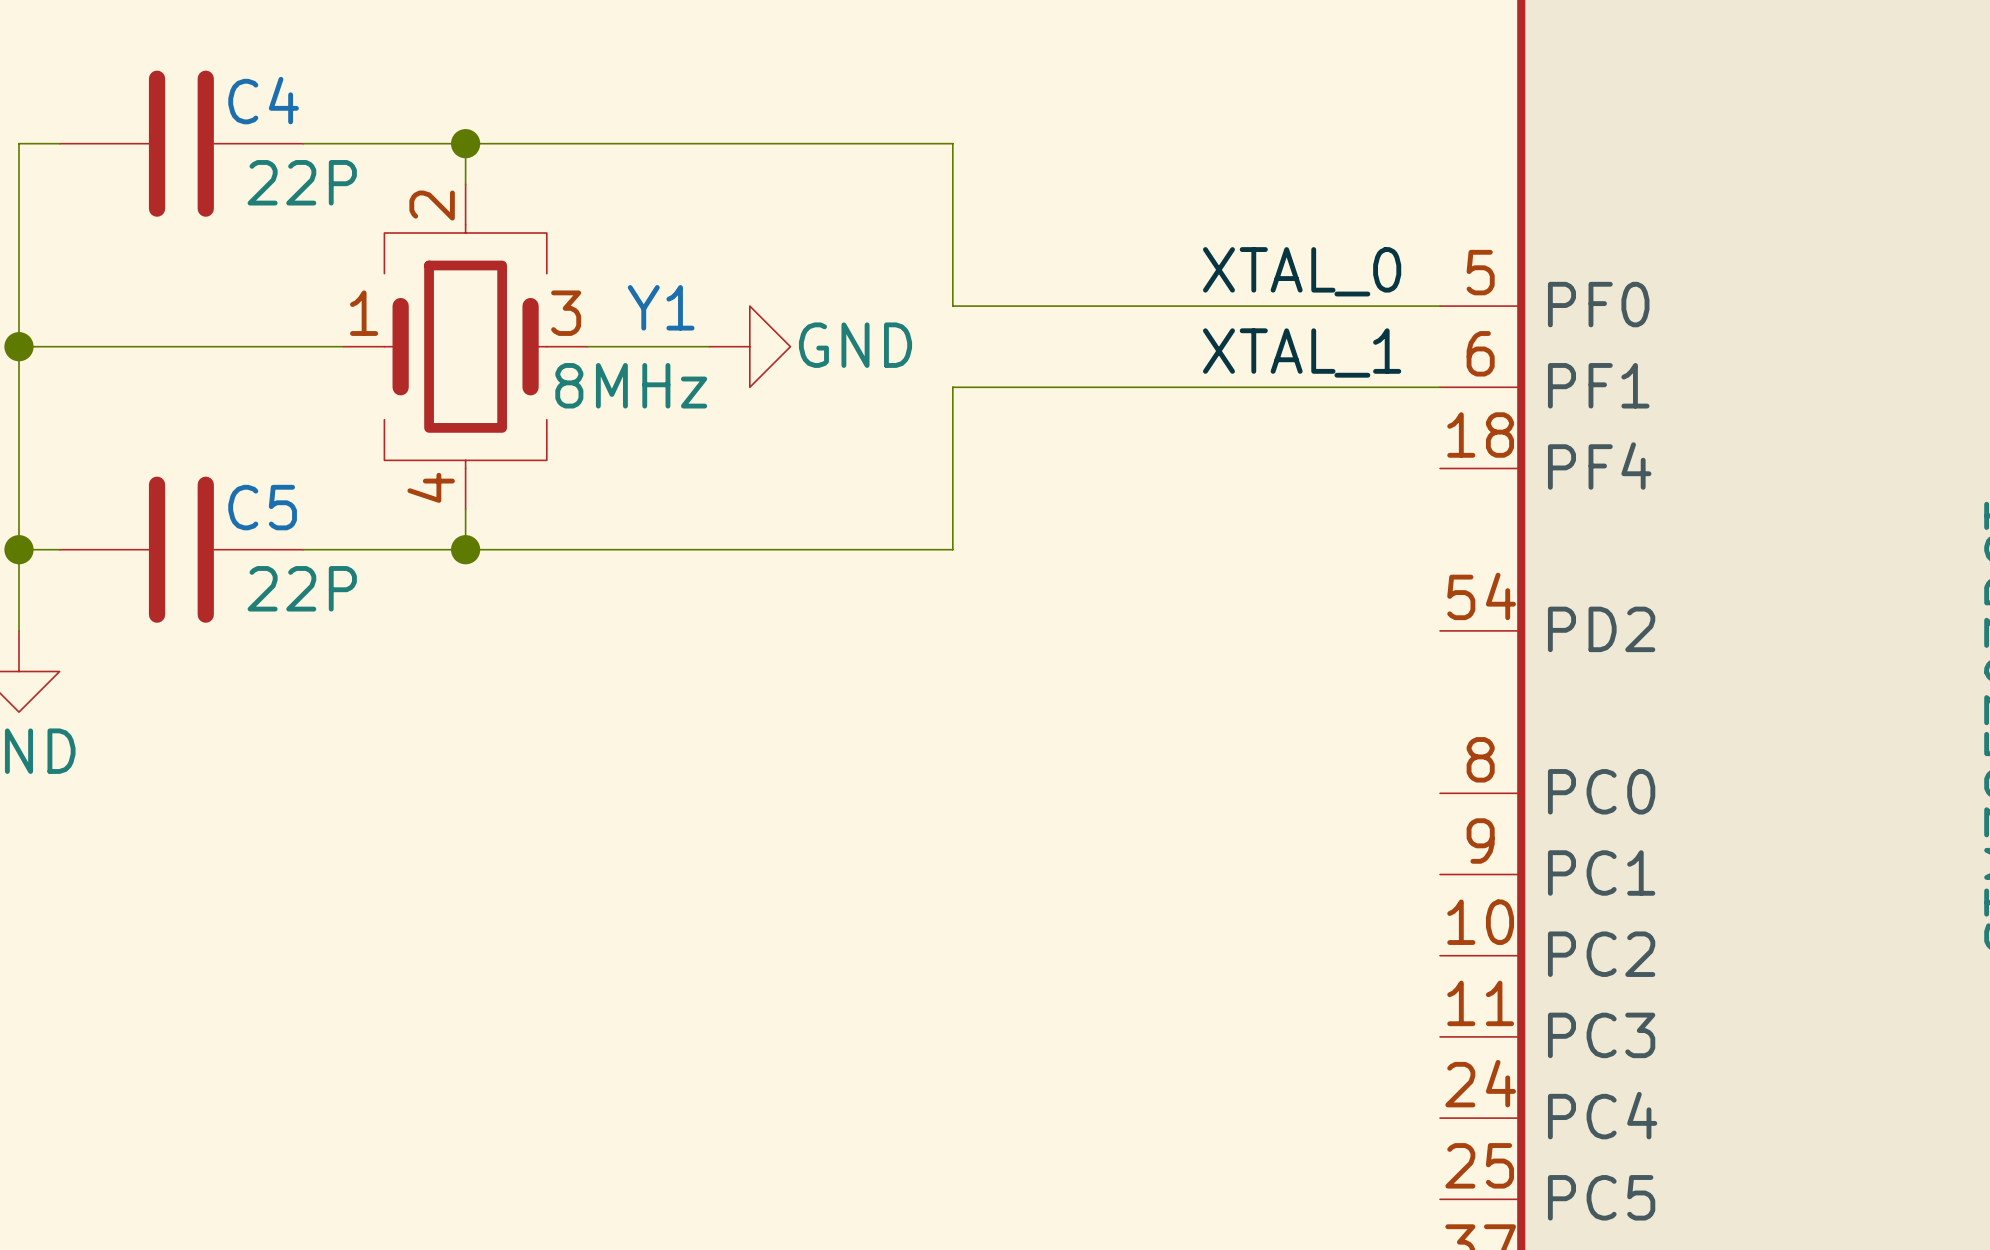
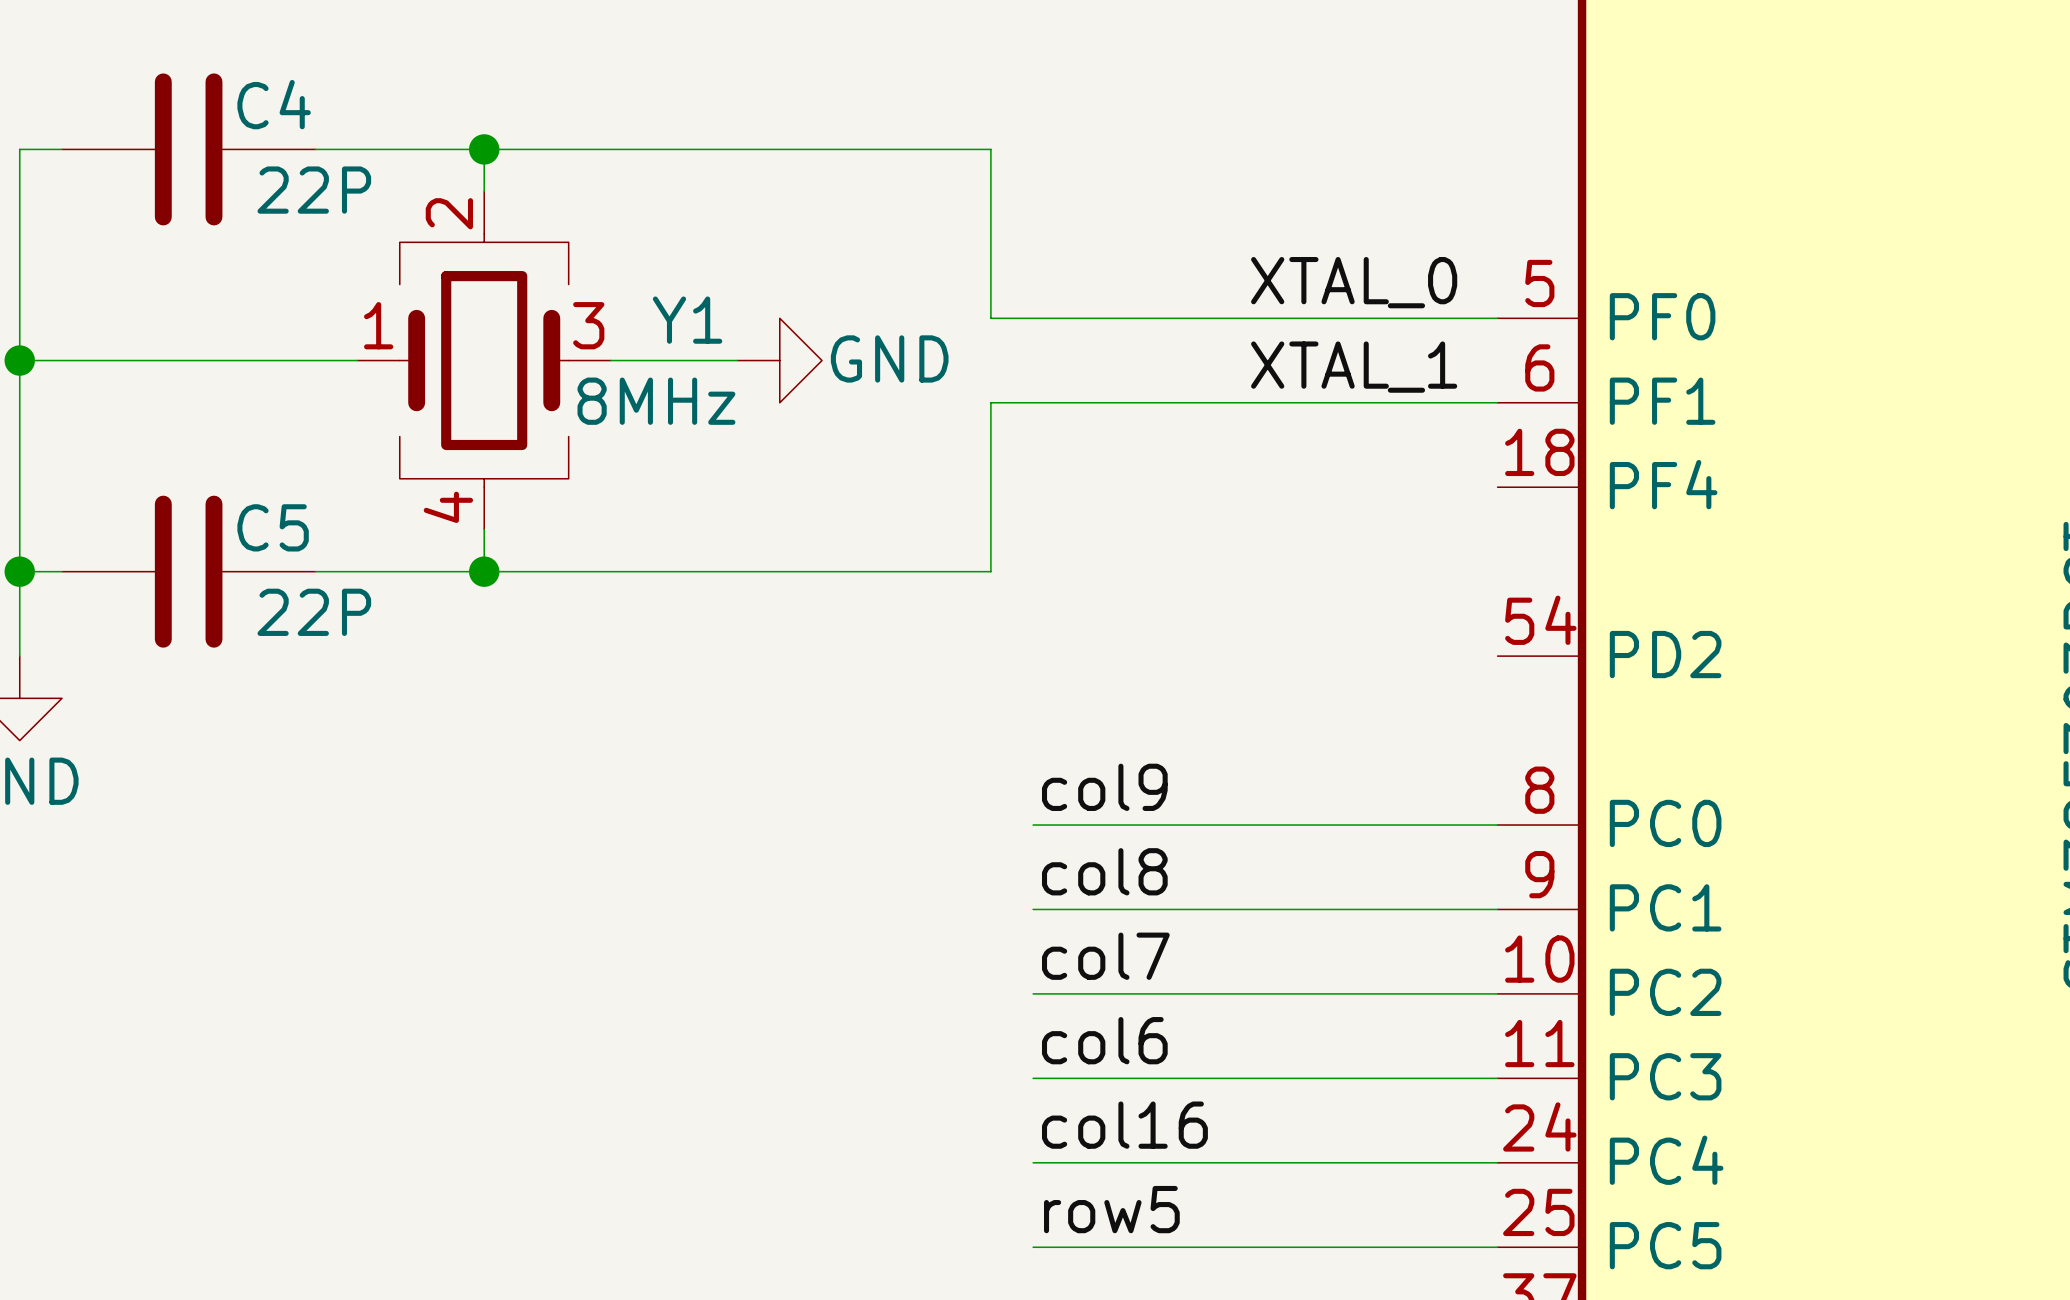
label: none -> col9 (1104, 787)
wire: none -> (1033, 825) (1497, 825)
label: none -> col8 (1104, 871)
wire: none -> (1033, 909) (1497, 909)
label: none -> col7 (1105, 956)
wire: none -> (1033, 993) (1497, 993)
label: none -> col6 (1104, 1040)
wire: none -> (1033, 1078) (1497, 1078)
label: none -> col16 (1124, 1125)
wire: none -> (1033, 1162) (1497, 1162)
label: none -> row5 (1111, 1209)
wire: none -> (1033, 1247) (1497, 1247)

